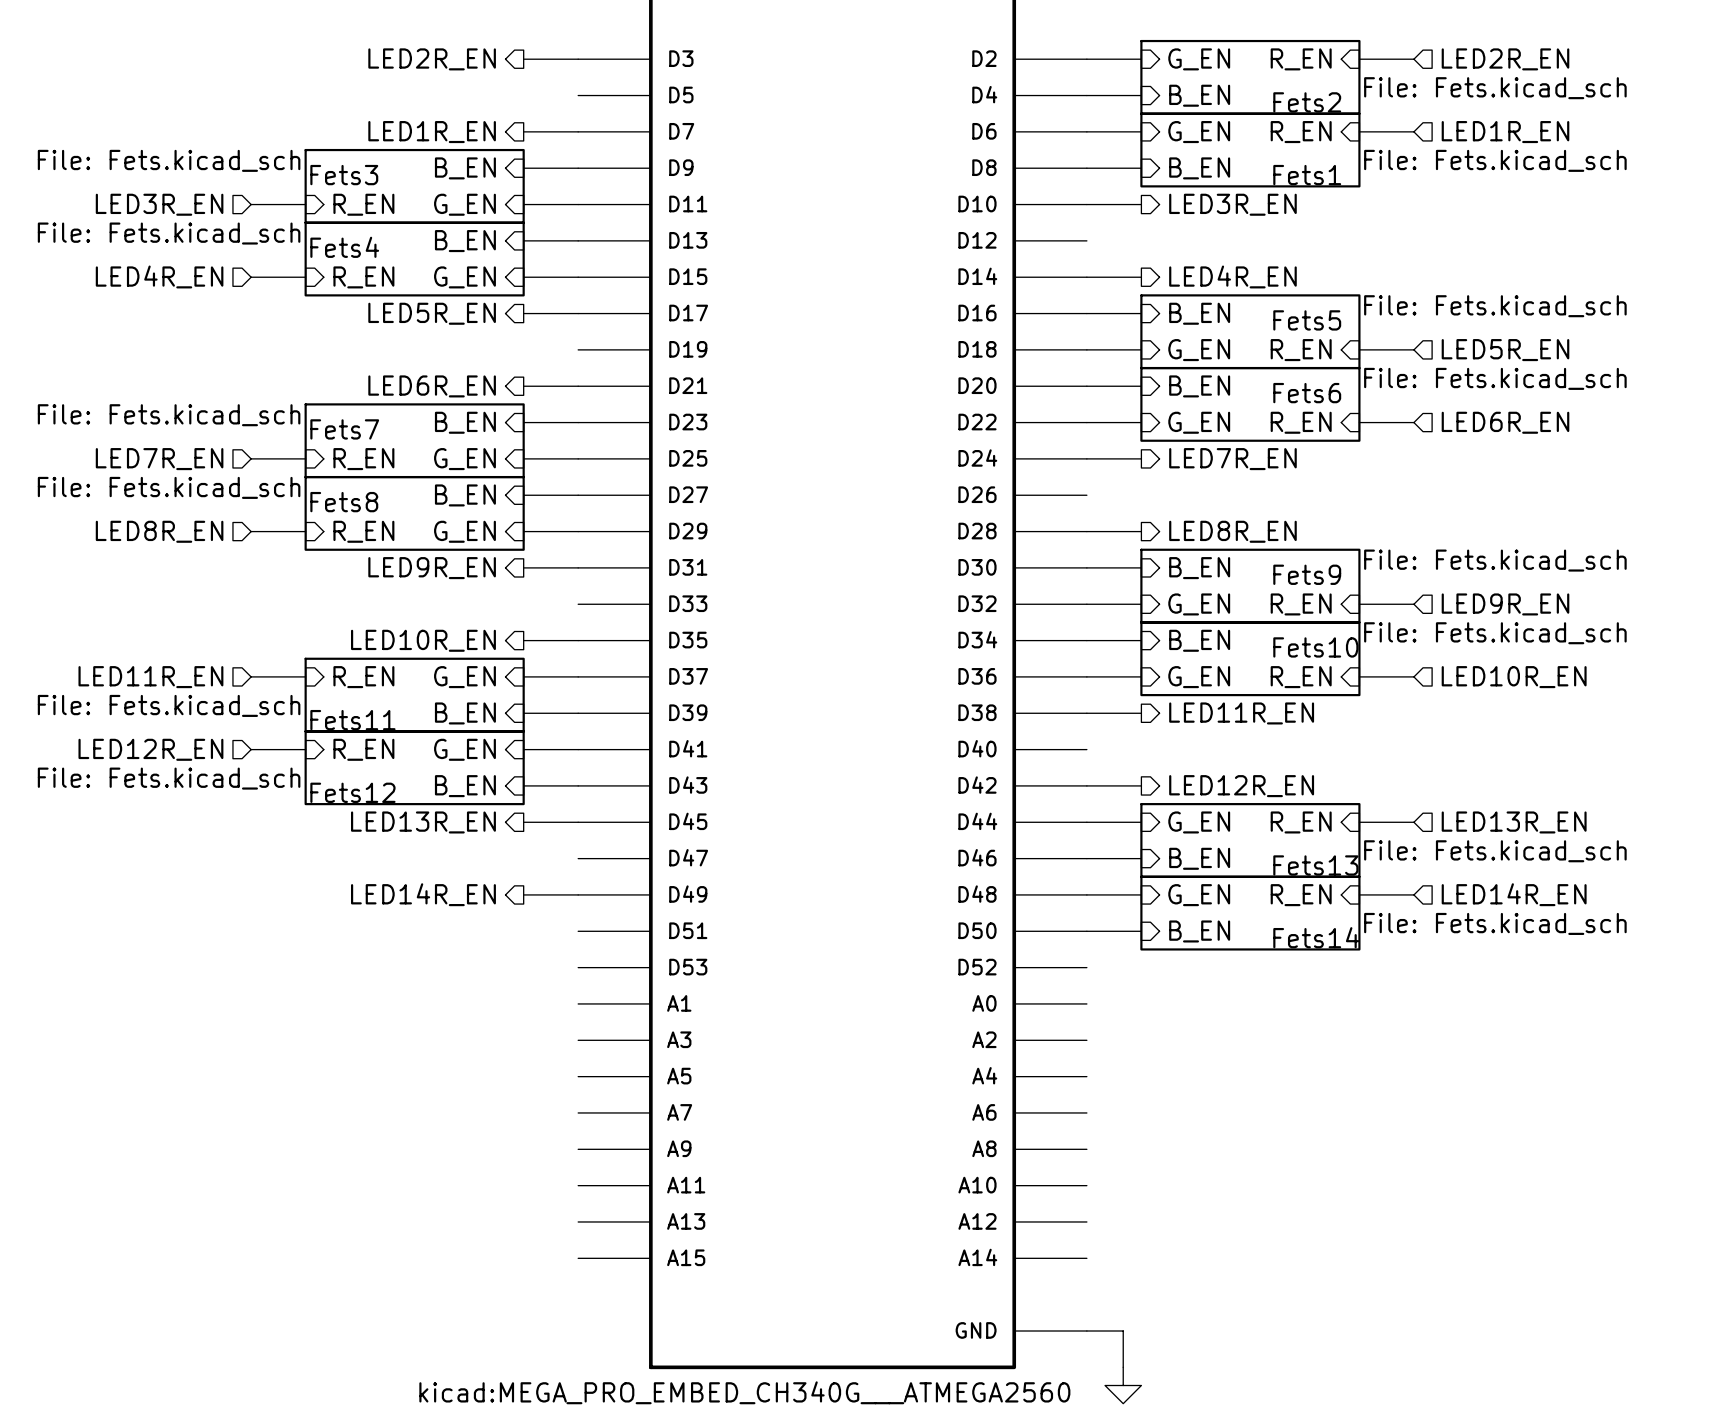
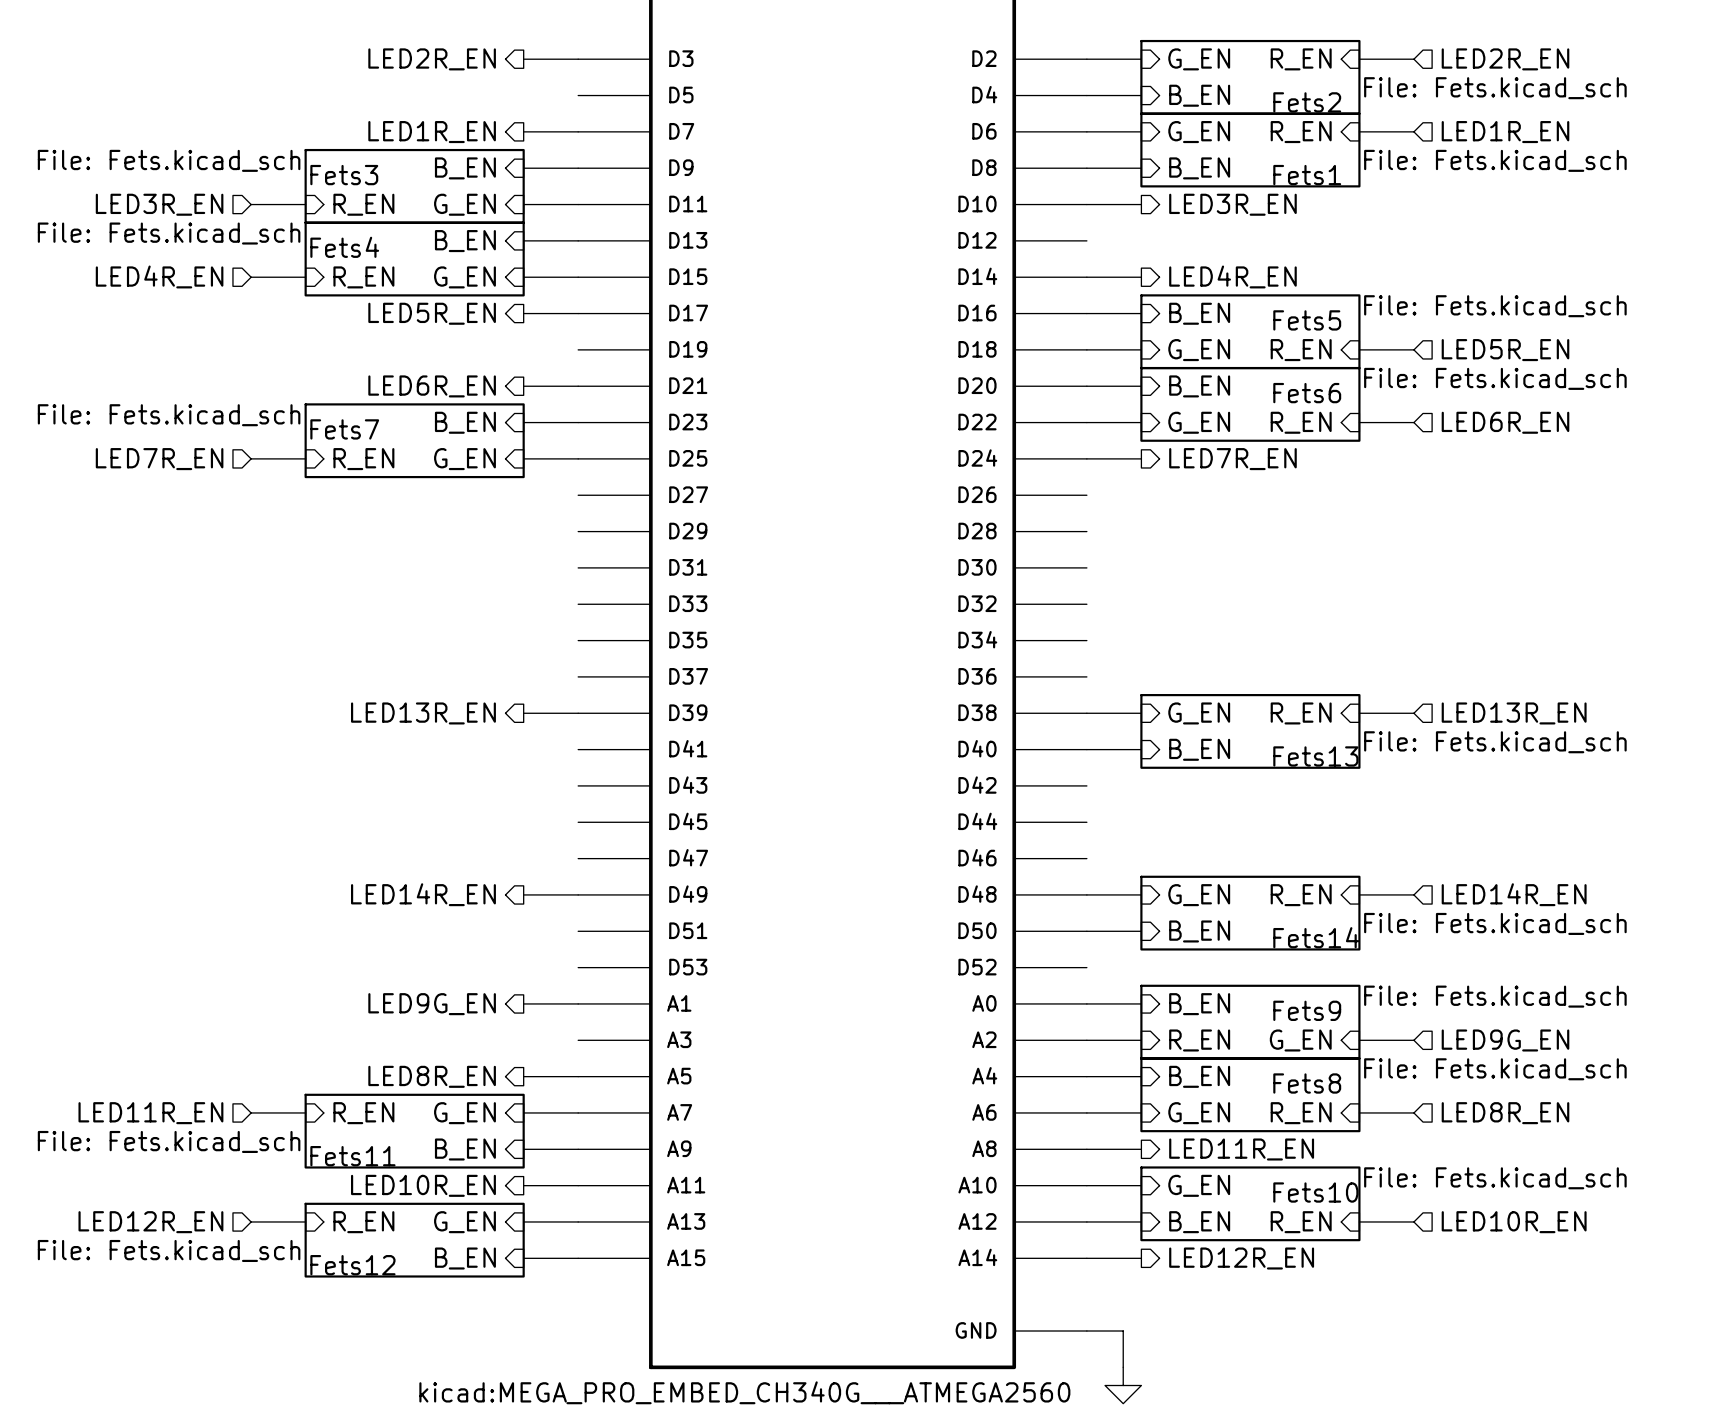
sheet Fets8 value position: File: Fets.kicad_sch (169, 487) -> File: Fets.kicad_sch (1495, 1069)
sheet pin: B_EN (465, 495) -> none
wire: (523, 495) (578, 495) -> none
sheet Fets8 name position: Fets8 (344, 502) -> Fets8 (1307, 1083)
sheet Fets8 position: (414, 513) -> (1250, 1094)
hierarchical label: LED8R_EN (159, 531) -> none
wire: (251, 531) (305, 531) -> none
sheet pin: R_EN (363, 531) -> none
sheet pin: G_EN (464, 531) -> none
wire: (523, 531) (578, 531) -> none
wire: (1086, 531) (1141, 531) -> (1086, 749) (1141, 749)
hierarchical label: LED8R_EN (1232, 531) -> none
wire: (523, 567) (578, 567) -> none
wire: (1086, 567) (1141, 567) -> none
hierarchical label: LED9R_EN (432, 568) -> none
sheet pin: B_EN (1199, 568) -> none
sheet Fets9 position: (1250, 586) -> (1250, 1022)
wire: (1086, 604) (1141, 604) -> none
sheet pin: G_EN (1199, 604) -> none
sheet pin: R_EN (1301, 604) -> none
wire: (1359, 604) (1413, 604) -> (1359, 713) (1413, 713)
hierarchical label: LED9R_EN (1505, 604) -> none
hierarchical label: LED10R_EN (423, 640) -> none
wire: (523, 640) (578, 640) -> none
wire: (1086, 640) (1141, 640) -> none
sheet pin: B_EN (1199, 640) -> none
sheet Fets10 position: (1250, 658) -> (1250, 1203)
wire: (251, 676) (305, 676) -> none
wire: (523, 676) (578, 676) -> (523, 1003) (578, 1003)
wire: (1086, 676) (1141, 676) -> (1086, 1003) (1141, 1003)
wire: (1359, 676) (1413, 676) -> none
hierarchical label: LED11R_EN (150, 677) -> none
sheet pin: R_EN (363, 677) -> none
sheet pin: G_EN (464, 677) -> none
sheet pin position: G_EN (1199, 677) -> G_EN (1199, 713)
sheet pin position: R_EN (1301, 677) -> R_EN (1301, 713)
hierarchical label: LED10R_EN (1514, 677) -> none
sheet Fets11 position: (414, 695) -> (414, 1131)
sheet pin: B_EN (465, 713) -> none
hierarchical label: LED11R_EN (1241, 713) -> none
hierarchical label: LED12R_EN (150, 749) -> none
wire: (251, 749) (305, 749) -> none
sheet pin: R_EN (363, 749) -> none
sheet pin: G_EN (464, 749) -> none
wire: (523, 749) (578, 749) -> (523, 1076) (578, 1076)
sheet pin: none -> B_EN (1199, 749)
sheet Fets12 position: (414, 767) -> (414, 1240)
wire: (523, 785) (578, 785) -> (523, 1112) (578, 1112)
wire: (1086, 785) (1141, 785) -> (1086, 1112) (1141, 1112)
sheet pin: B_EN (465, 786) -> none
hierarchical label: LED12R_EN (1241, 786) -> none
hierarchical label position: LED13R_EN (423, 822) -> LED13R_EN (423, 713)
wire: (523, 822) (578, 822) -> (523, 1149) (578, 1149)
wire: (1086, 822) (1141, 822) -> (1086, 1149) (1141, 1149)
sheet pin: G_EN (1199, 822) -> none
sheet pin: R_EN (1301, 822) -> none
wire: (1359, 822) (1413, 822) -> (1359, 1040) (1413, 1040)
hierarchical label position: LED13R_EN (1514, 822) -> LED13R_EN (1514, 713)
sheet Fets13 position: (1250, 840) -> (1250, 731)
wire: (1086, 858) (1141, 858) -> (1086, 1185) (1141, 1185)
sheet pin: B_EN (1199, 858) -> none
hierarchical label: none -> LED9G_EN (432, 1004)
sheet pin: none -> B_EN (1199, 1004)
wire: none -> (1086, 1040) (1141, 1040)
sheet pin: none -> R_EN (1199, 1040)
sheet pin: none -> G_EN (1300, 1040)
hierarchical label: none -> LED9G_EN (1505, 1040)
hierarchical label: none -> LED8R_EN (432, 1076)
wire: none -> (1086, 1076) (1141, 1076)
sheet pin: none -> B_EN (1199, 1076)
wire: none -> (251, 1112) (305, 1112)
wire: none -> (1359, 1112) (1413, 1112)
hierarchical label: none -> LED11R_EN (150, 1113)
sheet pin: none -> R_EN (363, 1113)
sheet pin: none -> G_EN (464, 1113)
sheet pin: none -> G_EN (1199, 1113)
sheet pin: none -> R_EN (1301, 1113)
hierarchical label: none -> LED8R_EN (1505, 1113)
sheet pin: none -> B_EN (465, 1149)
hierarchical label: none -> LED11R_EN (1241, 1149)
hierarchical label: none -> LED10R_EN (423, 1185)
wire: none -> (523, 1185) (578, 1185)
sheet pin: none -> G_EN (1199, 1185)
wire: none -> (251, 1221) (305, 1221)
wire: none -> (523, 1221) (578, 1221)
wire: none -> (1086, 1221) (1141, 1221)
wire: none -> (1359, 1221) (1413, 1221)
hierarchical label: none -> LED12R_EN (150, 1222)
sheet pin: none -> R_EN (363, 1222)
sheet pin: none -> G_EN (464, 1222)
sheet pin: none -> B_EN (1199, 1222)
sheet pin: none -> R_EN (1301, 1222)
hierarchical label: none -> LED10R_EN (1514, 1222)
sheet pin: none -> B_EN (465, 1258)
wire: none -> (523, 1258) (578, 1258)
wire: none -> (1086, 1258) (1141, 1258)
hierarchical label: none -> LED12R_EN (1241, 1258)

